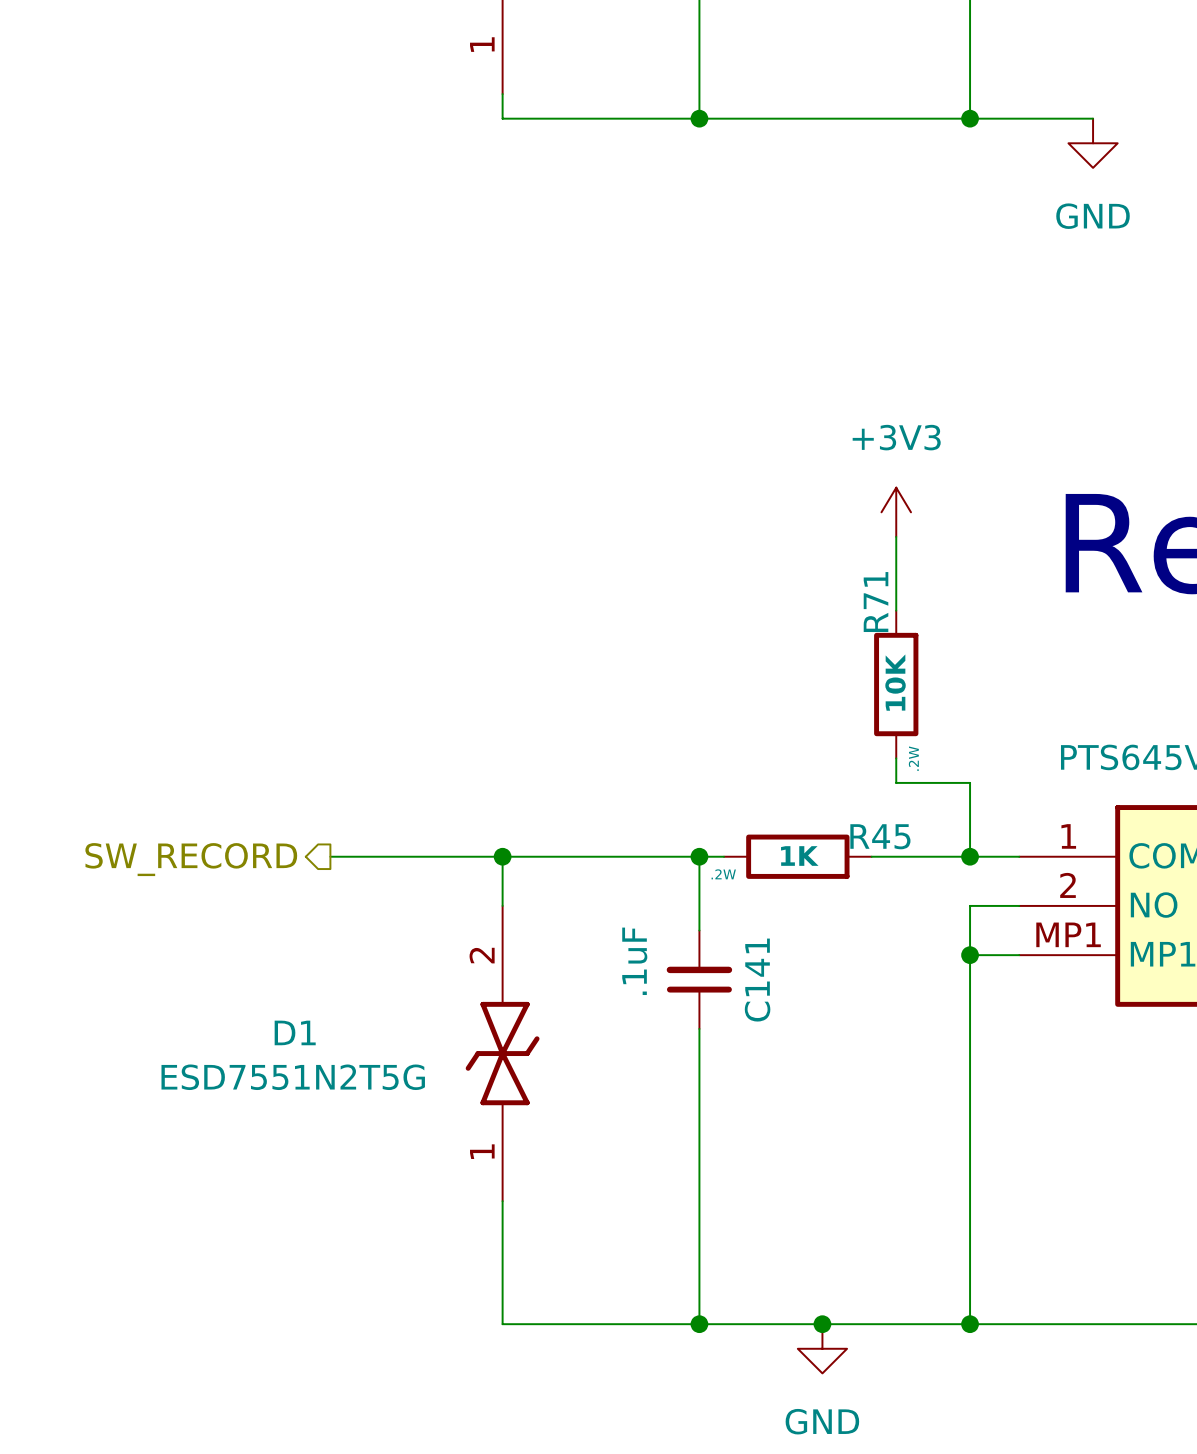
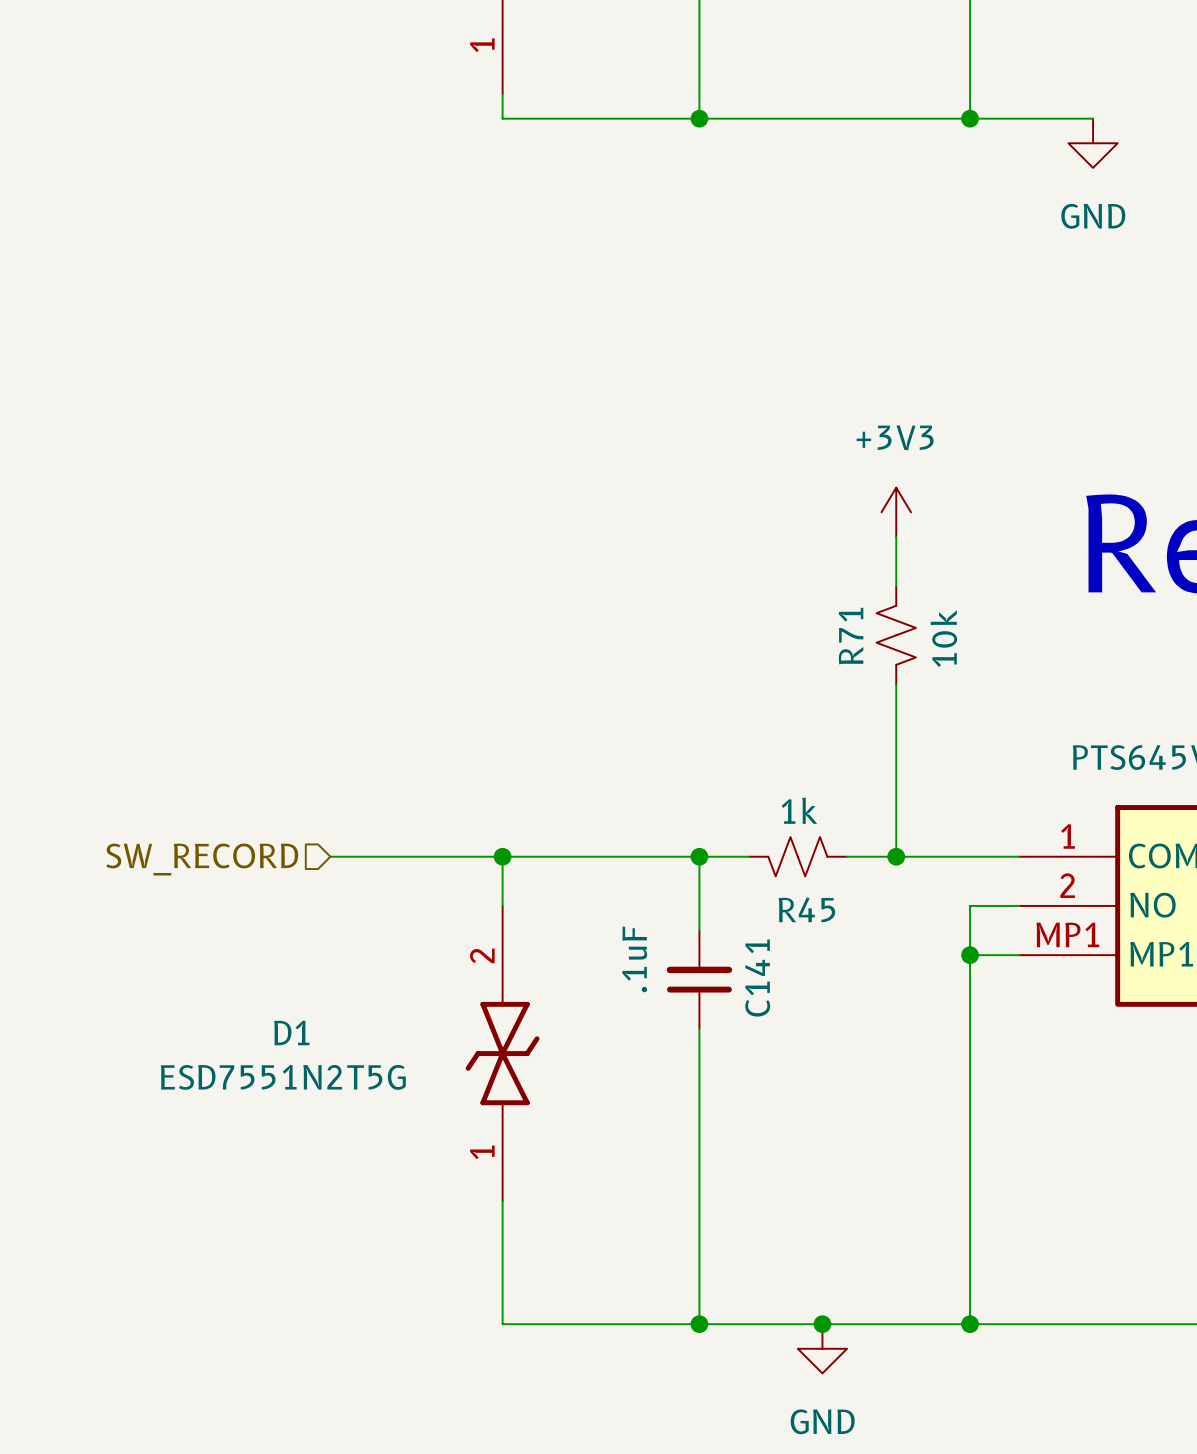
R71 name position: R71 (876, 602) -> R71 (851, 636)
R71 symbol: [874, 610, 919, 759] -> [876, 586, 916, 685]
R71 value: 10K (895, 682) -> 10k (943, 638)
wire: none -> (896, 684) (896, 758)
R71 text: .2W (913, 758) -> none
wire: (896, 782) (970, 782) (970, 856) -> (896, 782) (896, 856)
R45 symbol: [724, 834, 872, 879] -> [748, 837, 848, 877]
R45 name position: R45 (880, 836) -> R45 (806, 909)
R45 value: 1K (799, 856) -> 1k (799, 810)
junction position: (970, 856) -> (896, 856)
hierarchical label shape: output (191, 859) -> input (202, 859)
R45 text: .2W (723, 874) -> none

